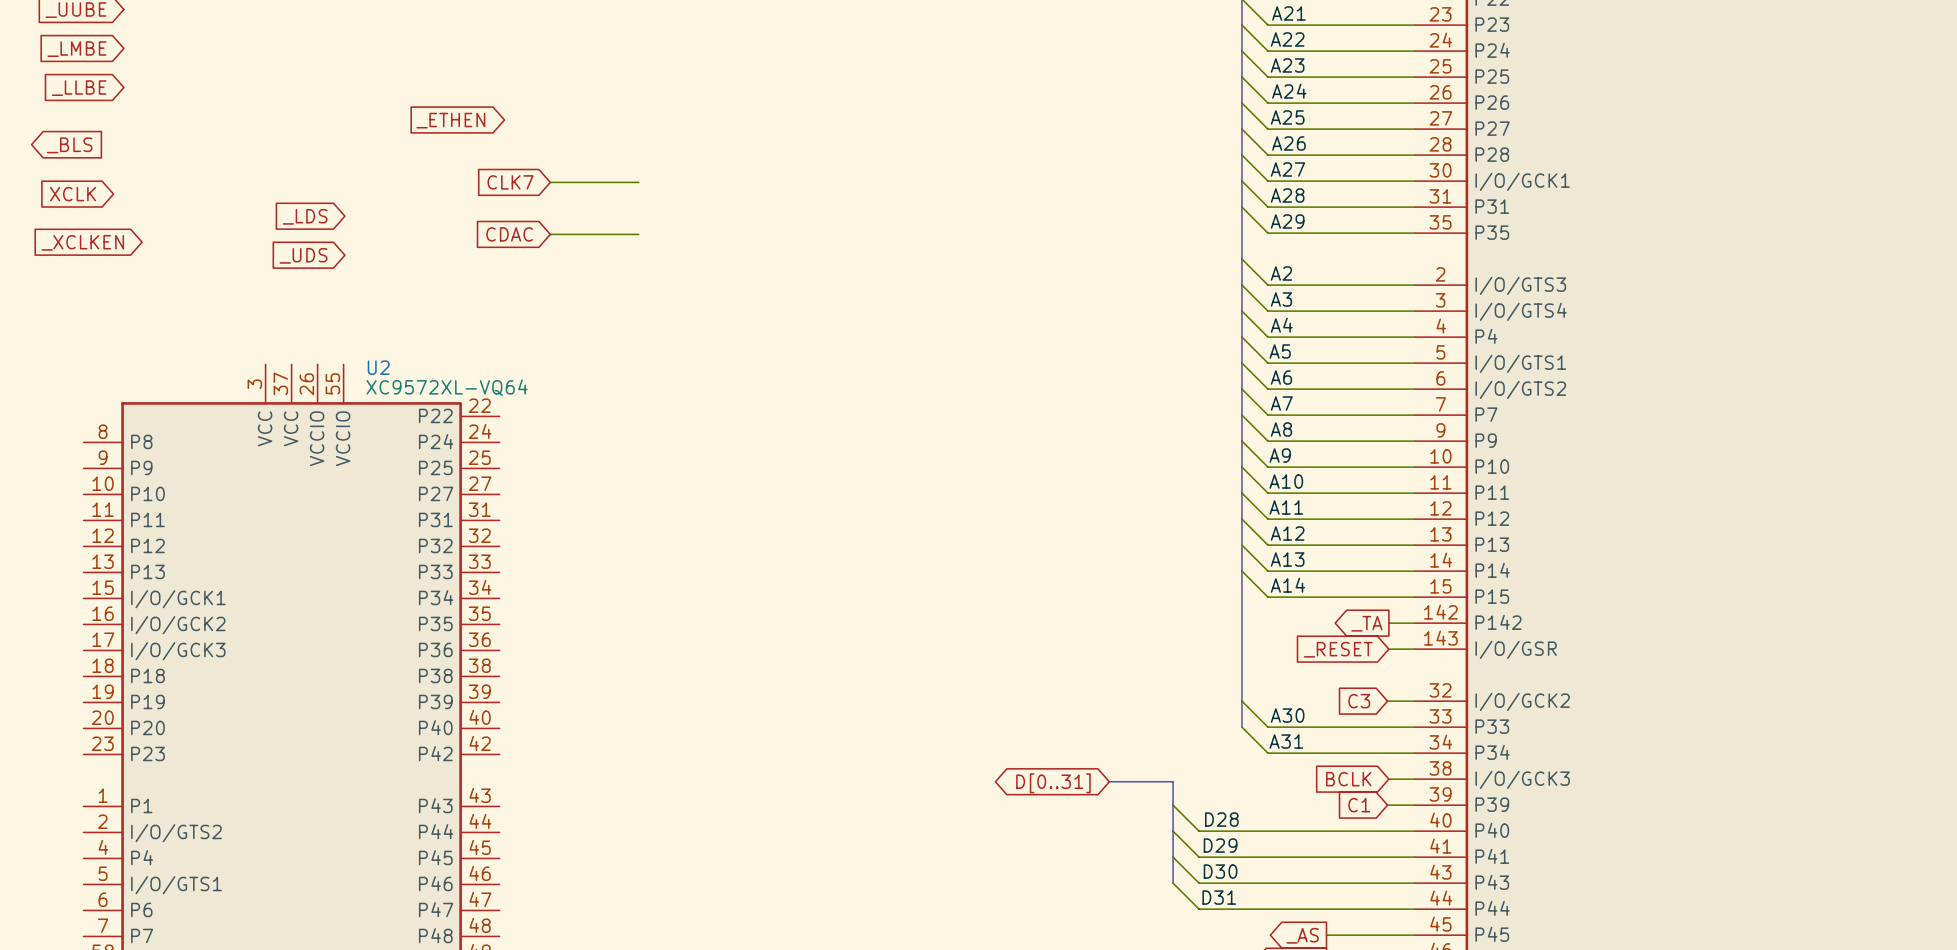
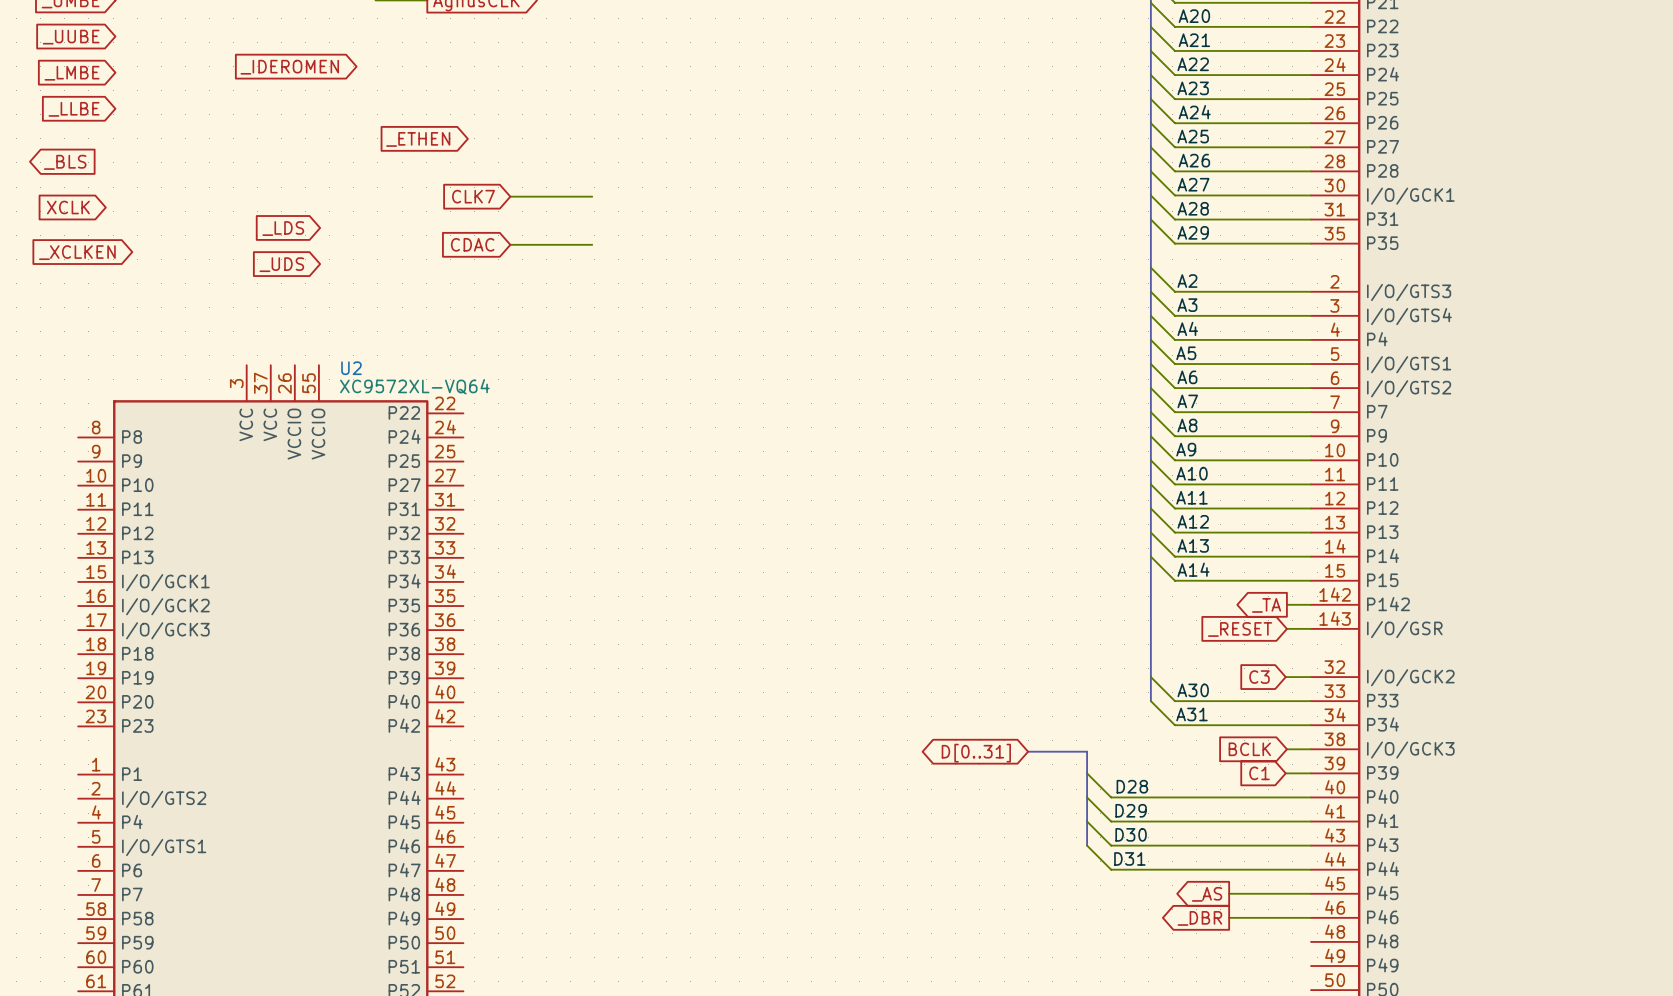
global label: none -> _IDEROMEN (289, 67)

